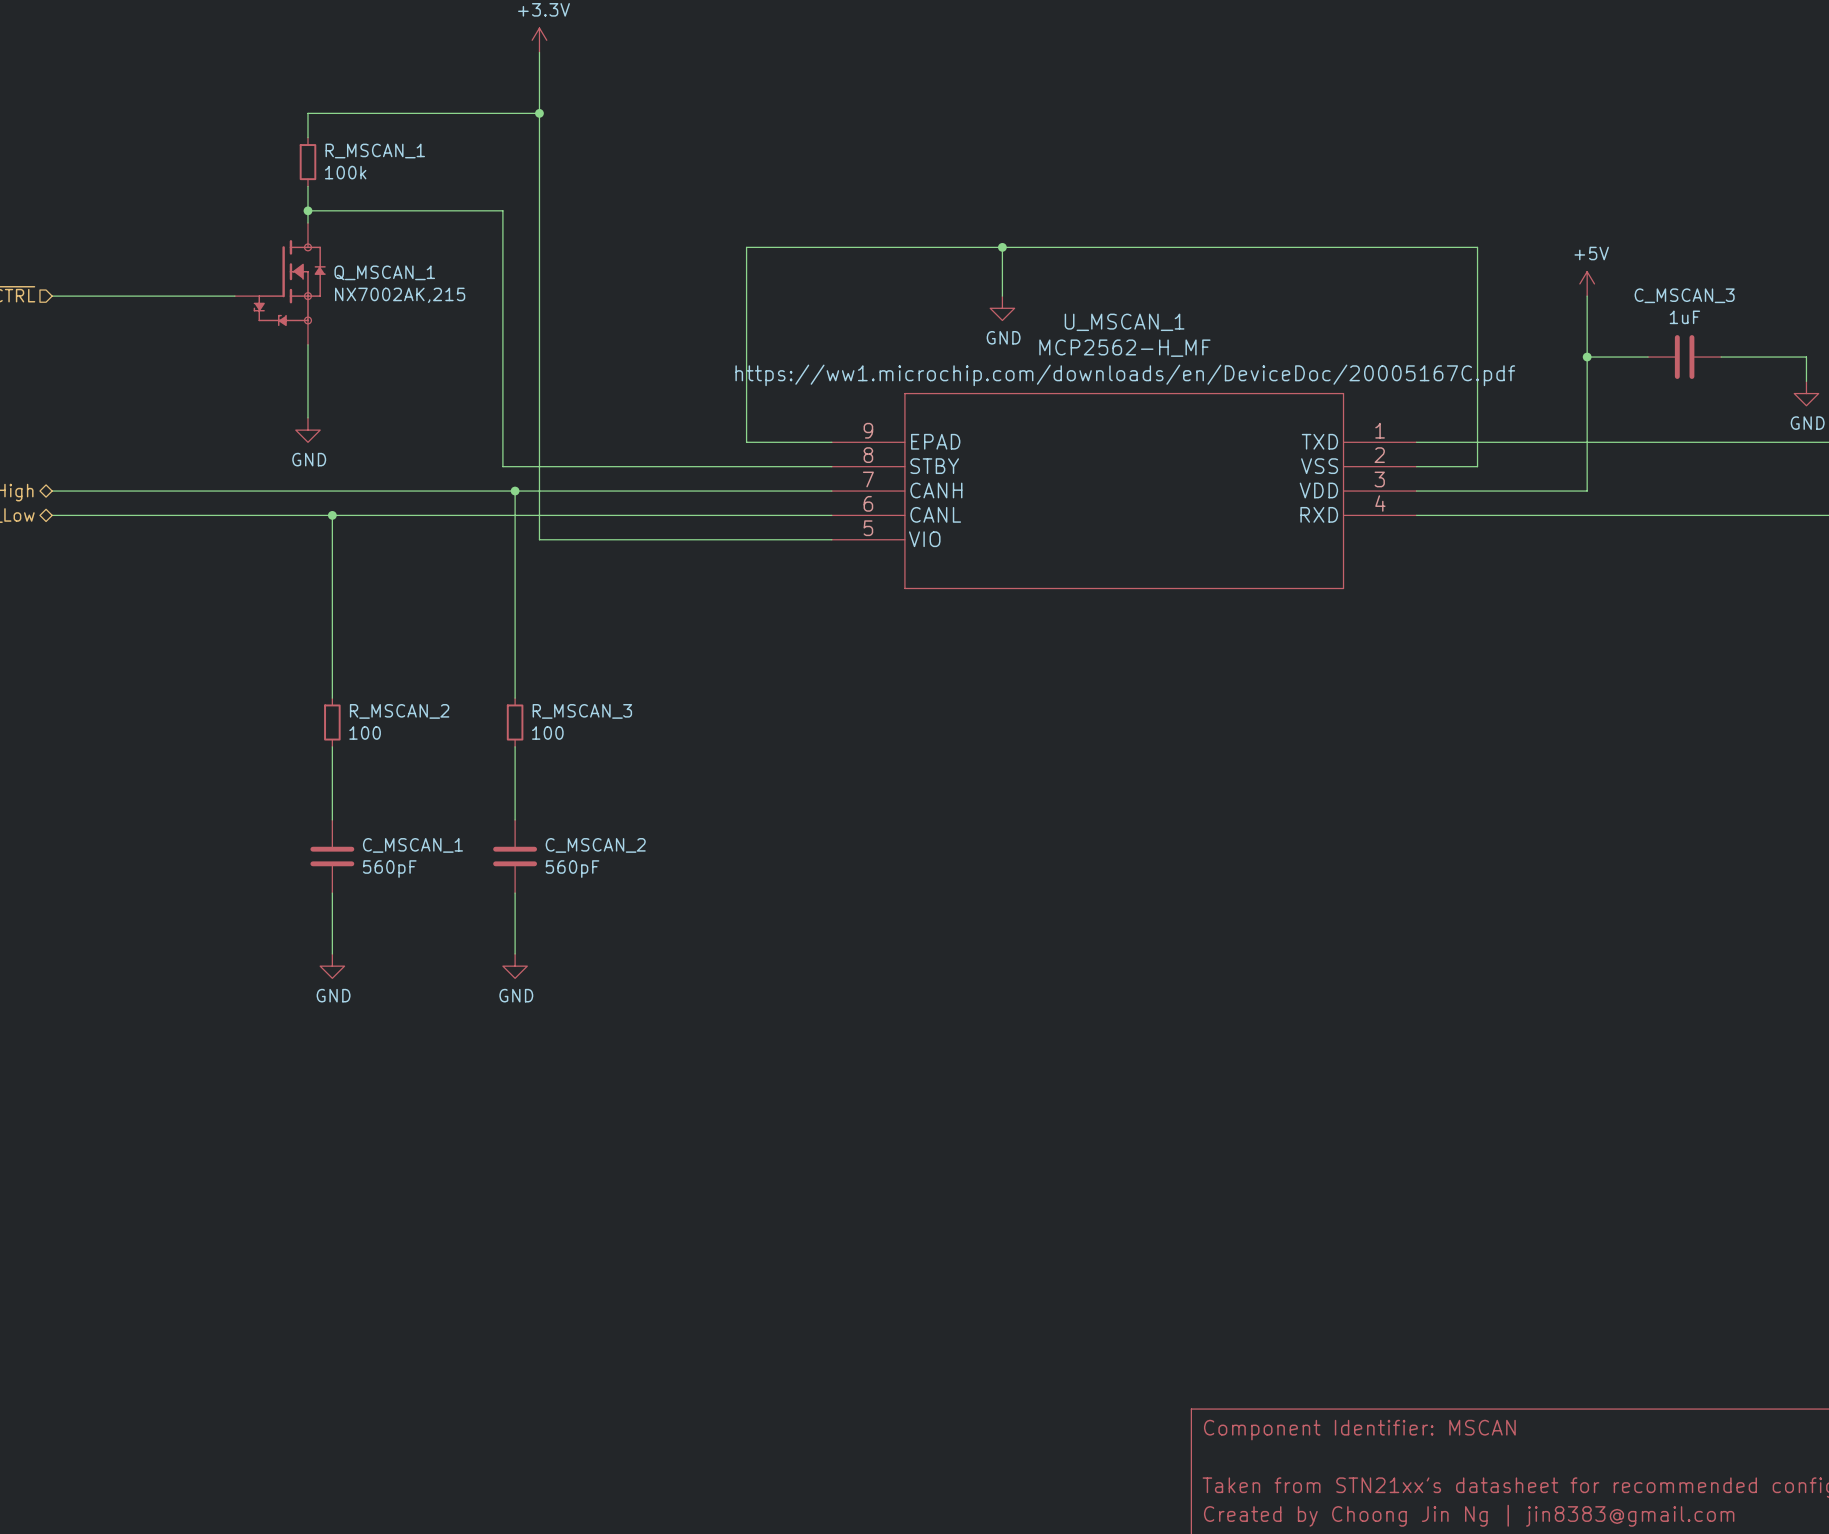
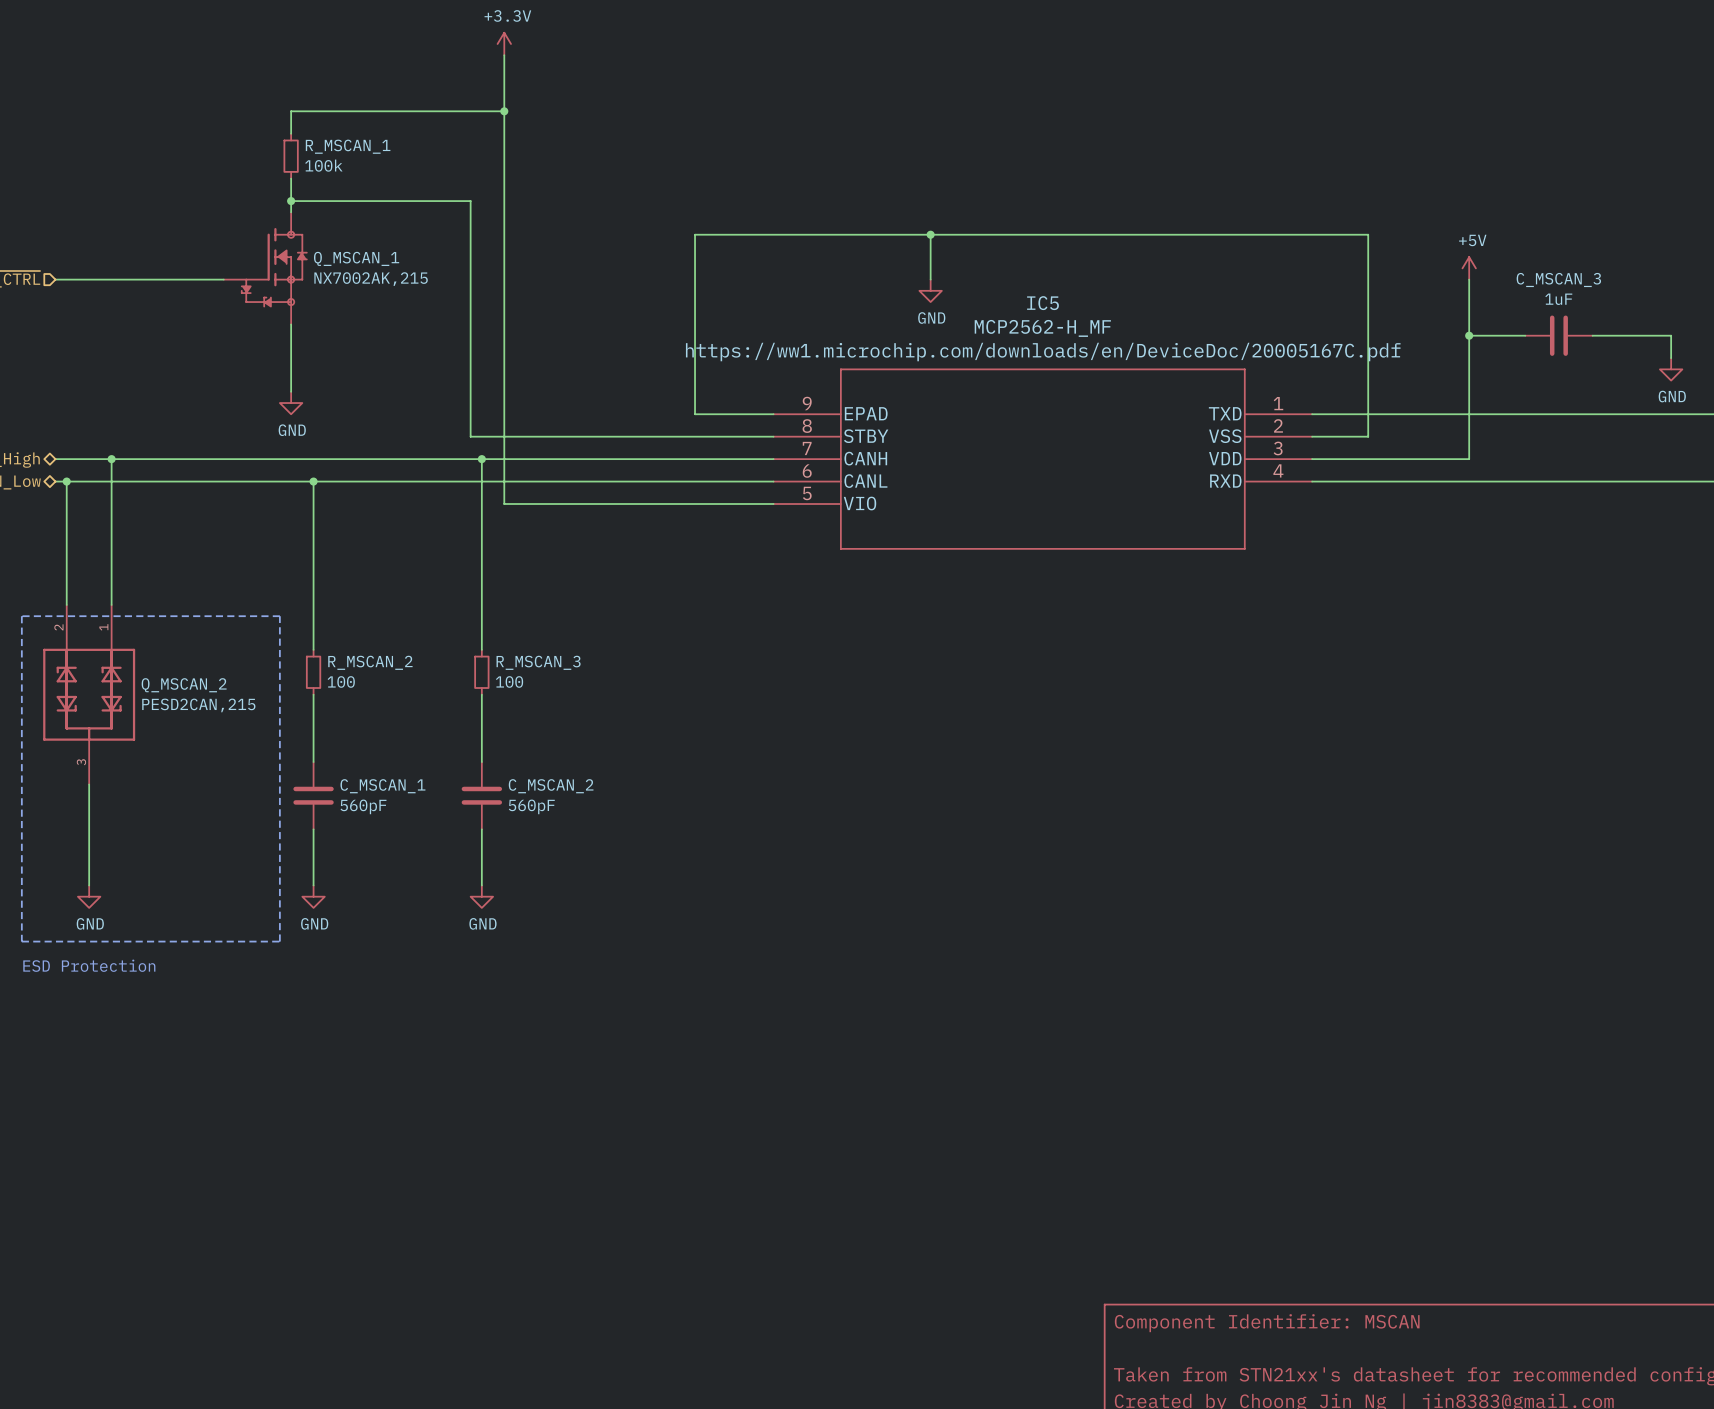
U_MSCAN_1 name: U_MSCAN_1 (1124, 322) -> IC5 (1043, 303)
wire: none -> (111, 459) (111, 604)
junction: none -> (111, 459)
wire: none -> (66, 481) (66, 604)
junction: none -> (66, 481)
line: none -> (21, 616) (279, 616) (279, 941) (21, 941) (21, 616)
Q_MSCAN_2: none -> PESD2CAN,215 (89, 694)
wire: none -> (89, 784) (89, 885)
power symbol: none -> GND (89, 896)
text: none -> ESD Protection (89, 965)

